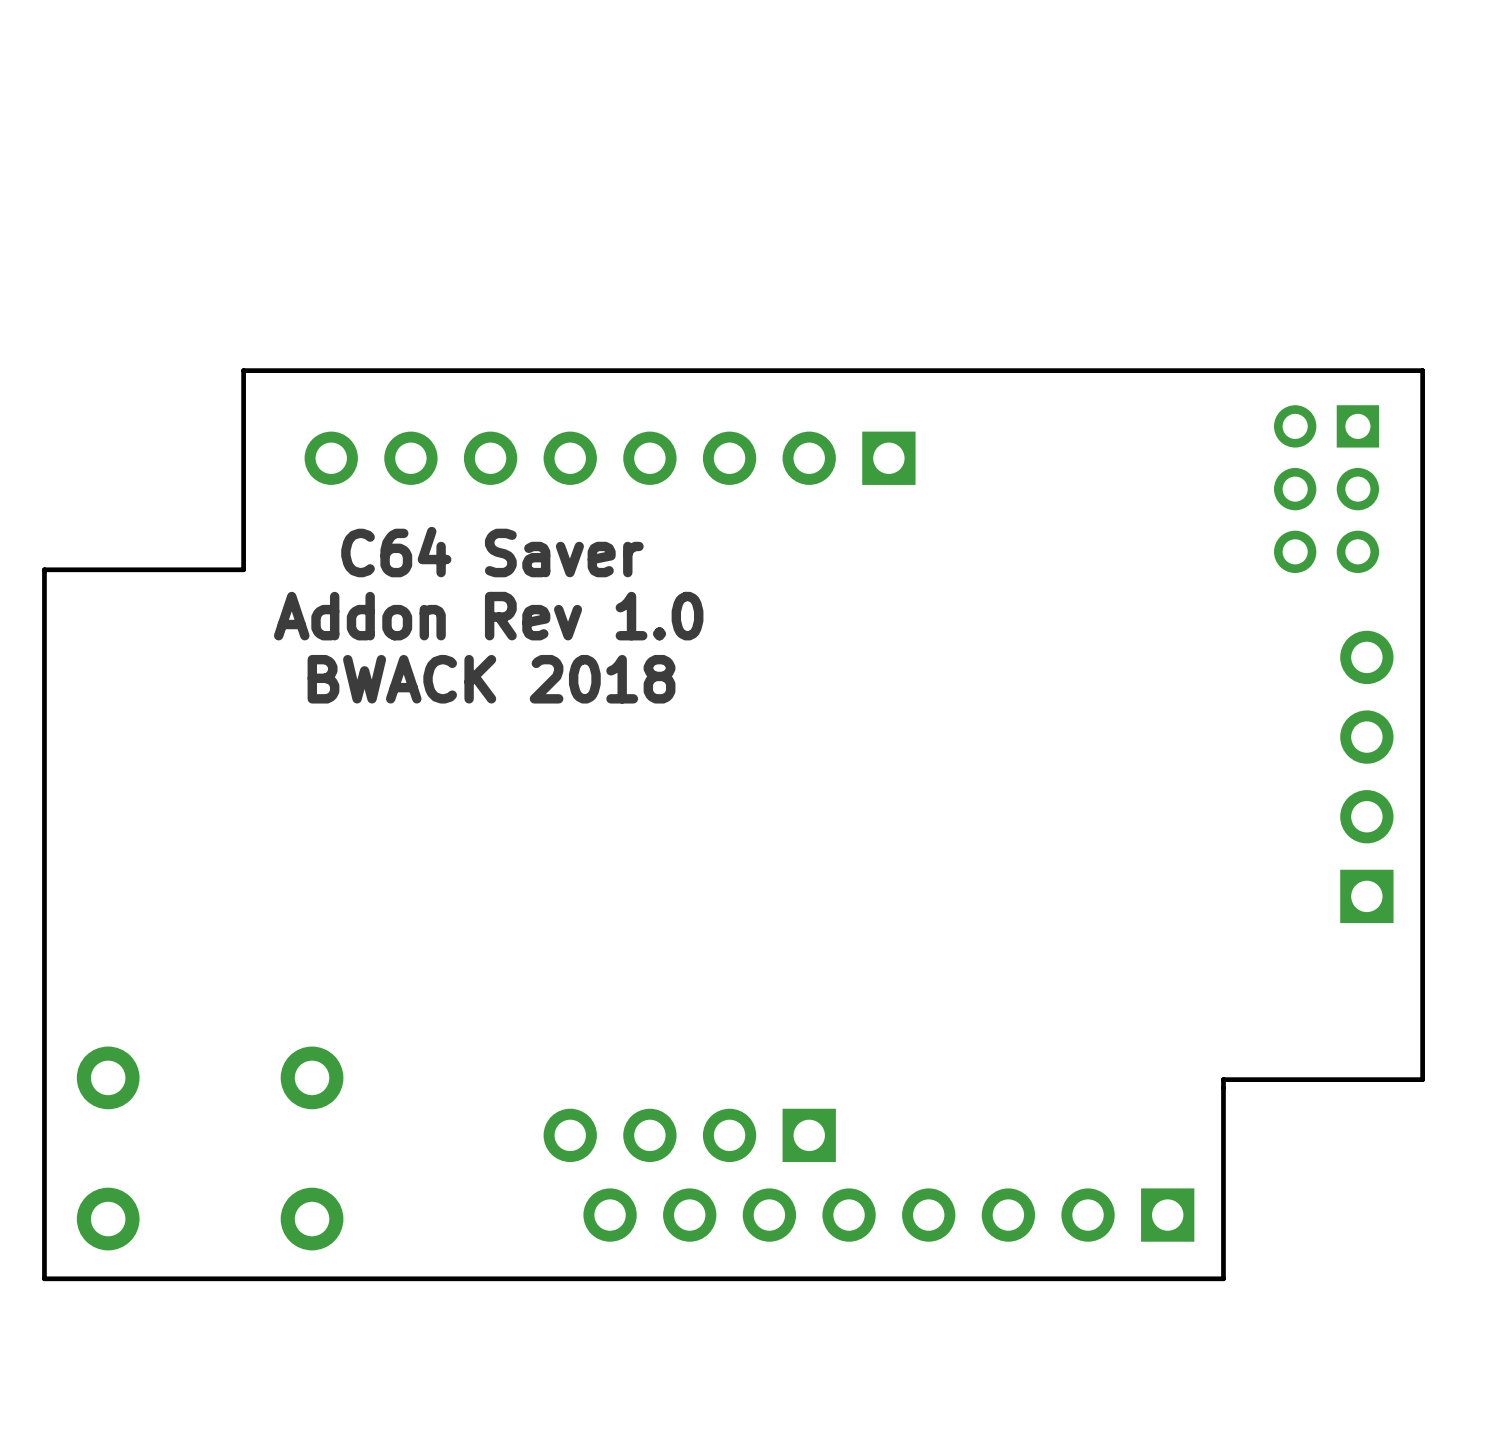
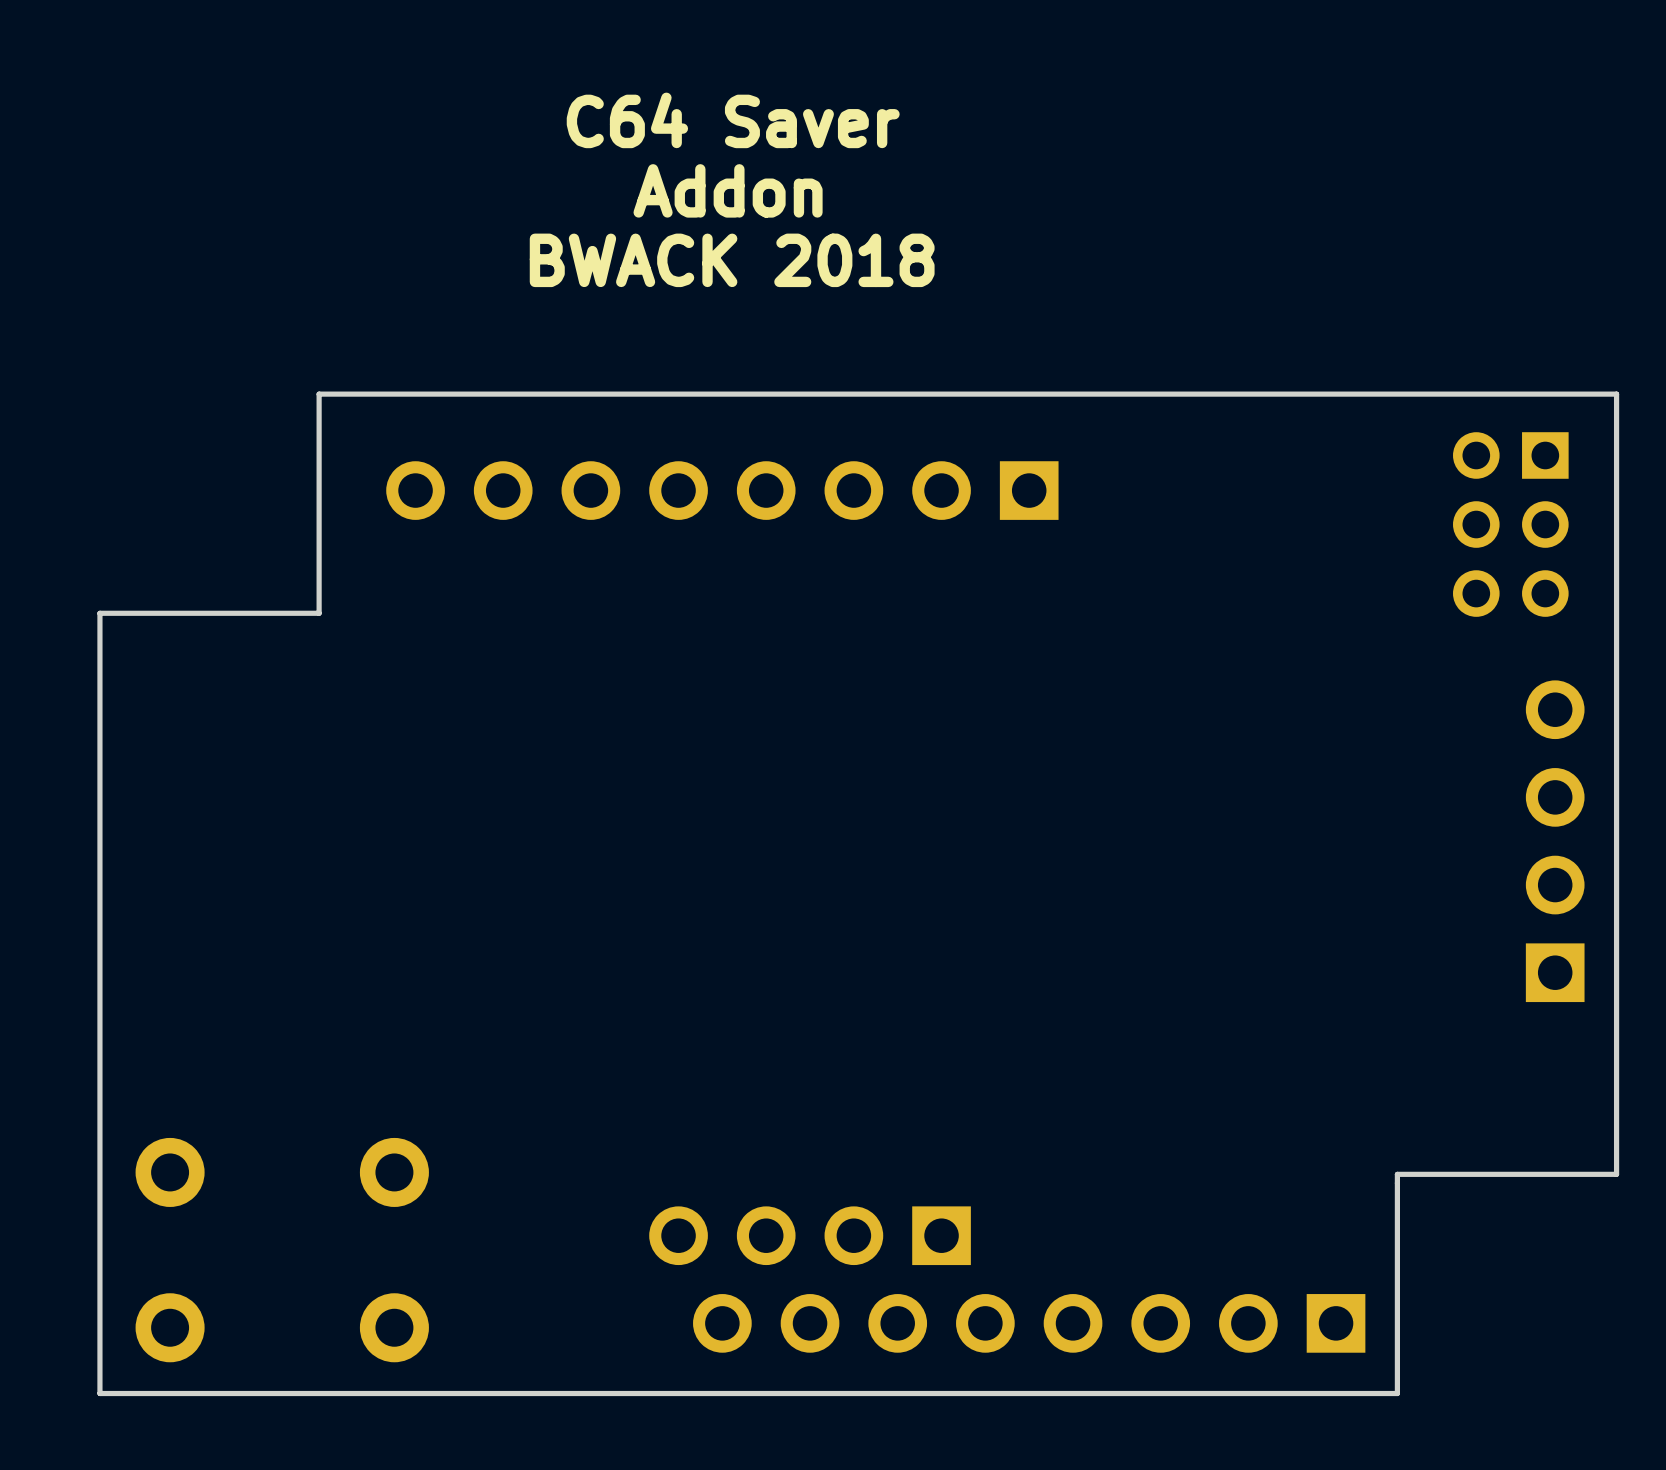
text: none -> Addon (728, 190)
text position: C64 Saver (492, 552) -> C64 Saver (733, 120)
text: Addon Rev 1.0 (488, 616) -> none
text position: BWACK 2018 (491, 679) -> BWACK 2018 (732, 260)

